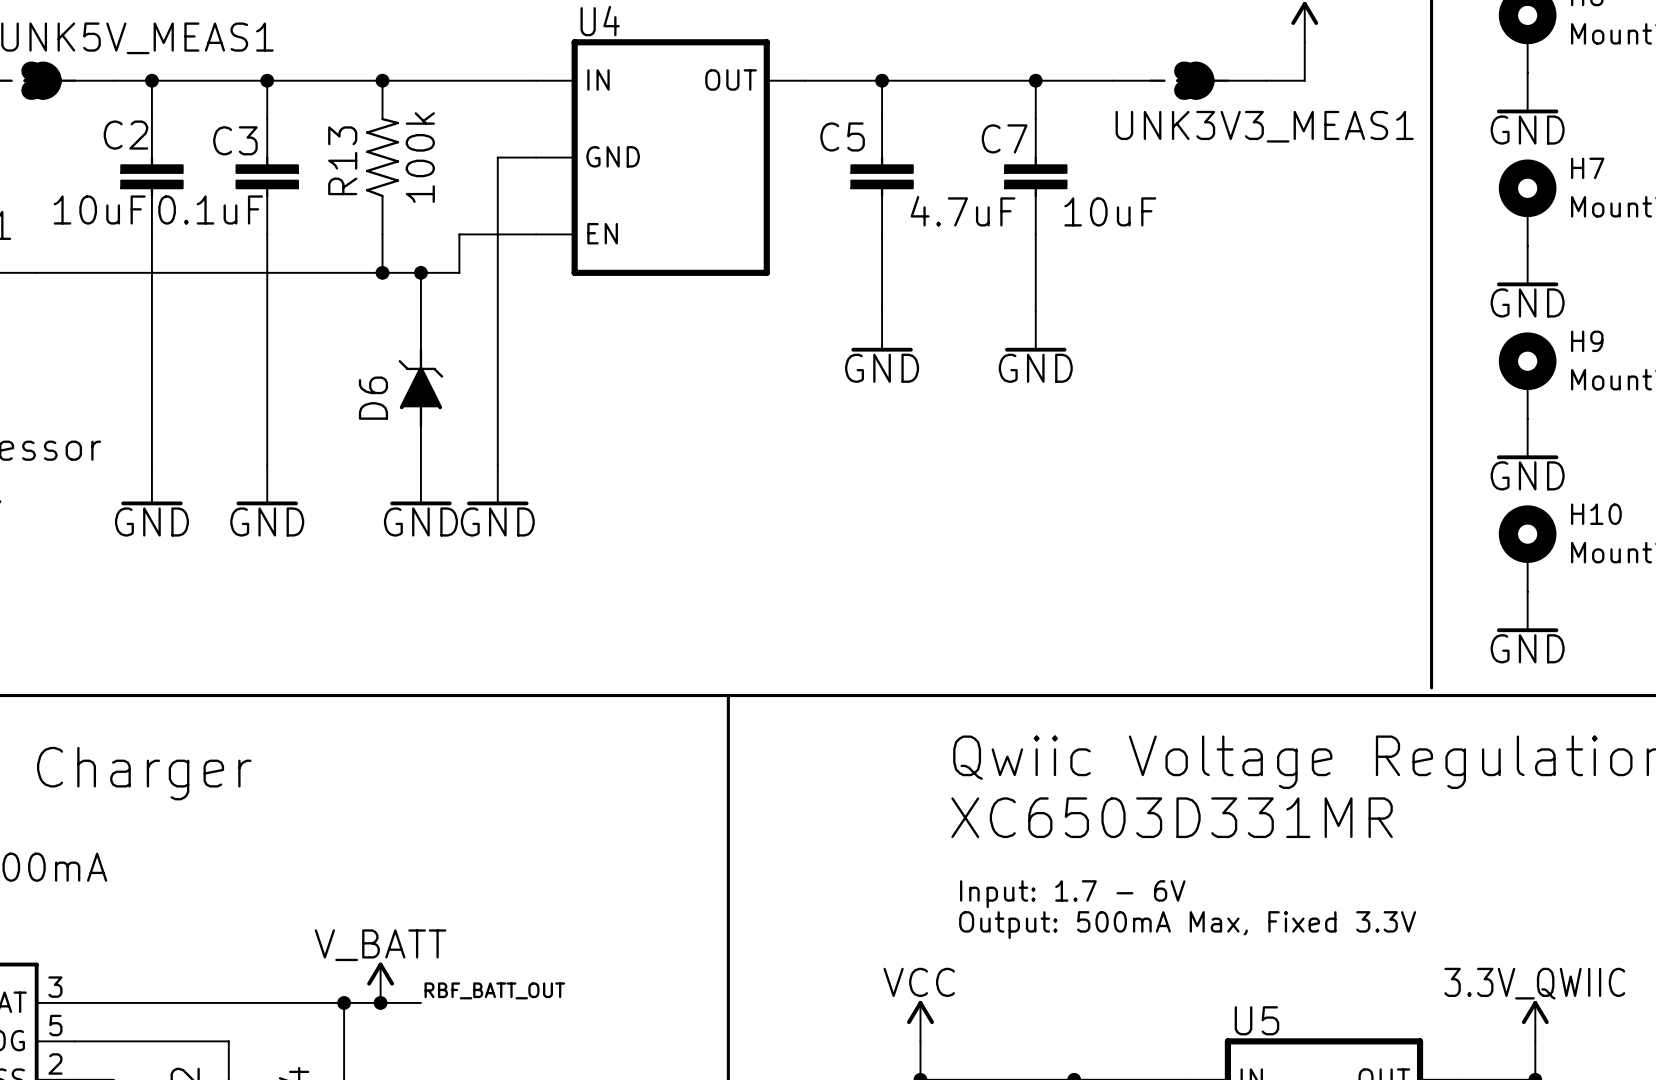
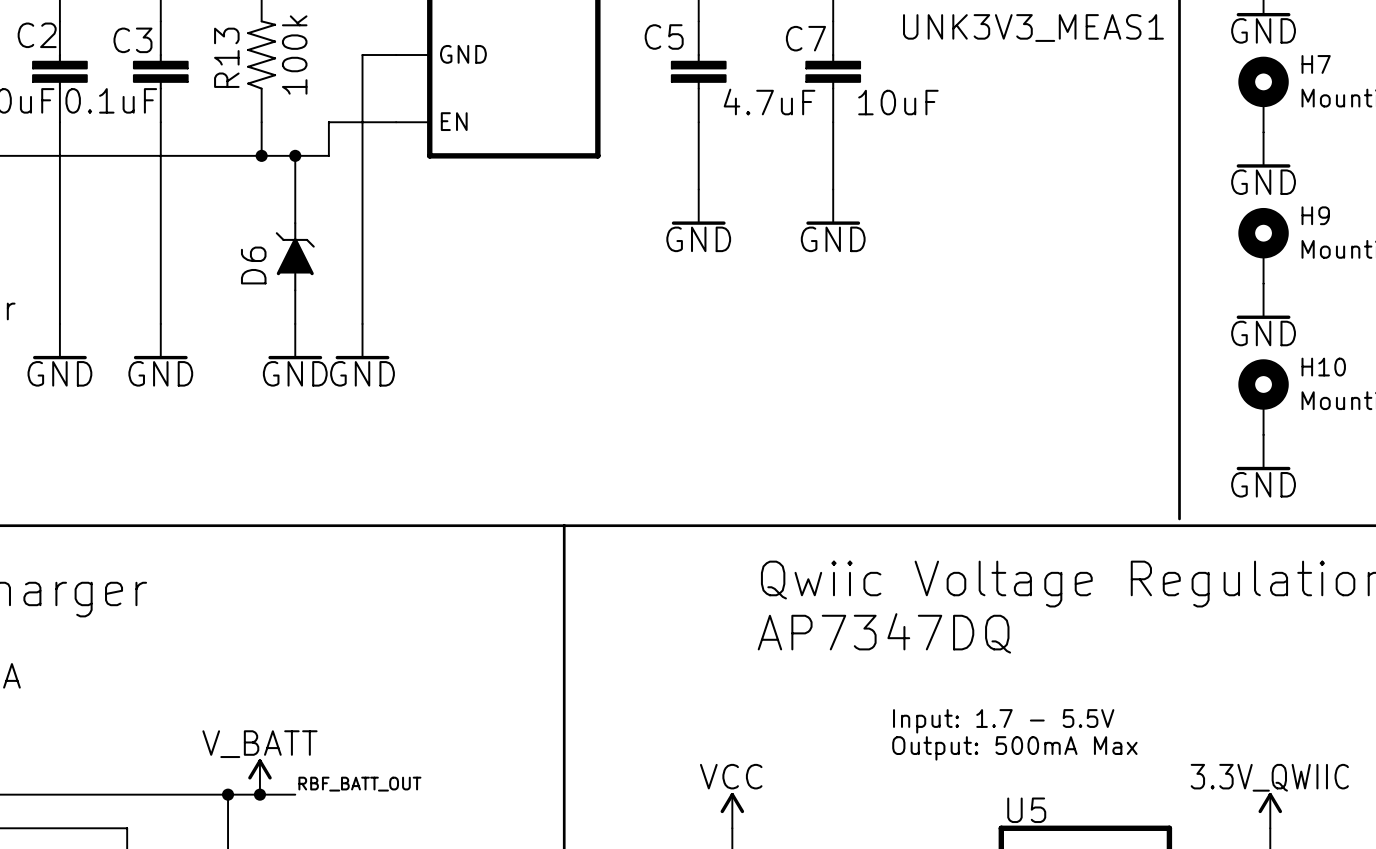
text: XC6503D331MR (1172, 817) -> AP7347DQ (884, 633)
text: Input: 1.7 - 6V (1072, 894) -> Input: 1.7 - 5.5V (1003, 721)
text: Output: 500mA Max, Fixed 3.3V (1187, 925) -> Output: 500mA Max (1014, 748)

